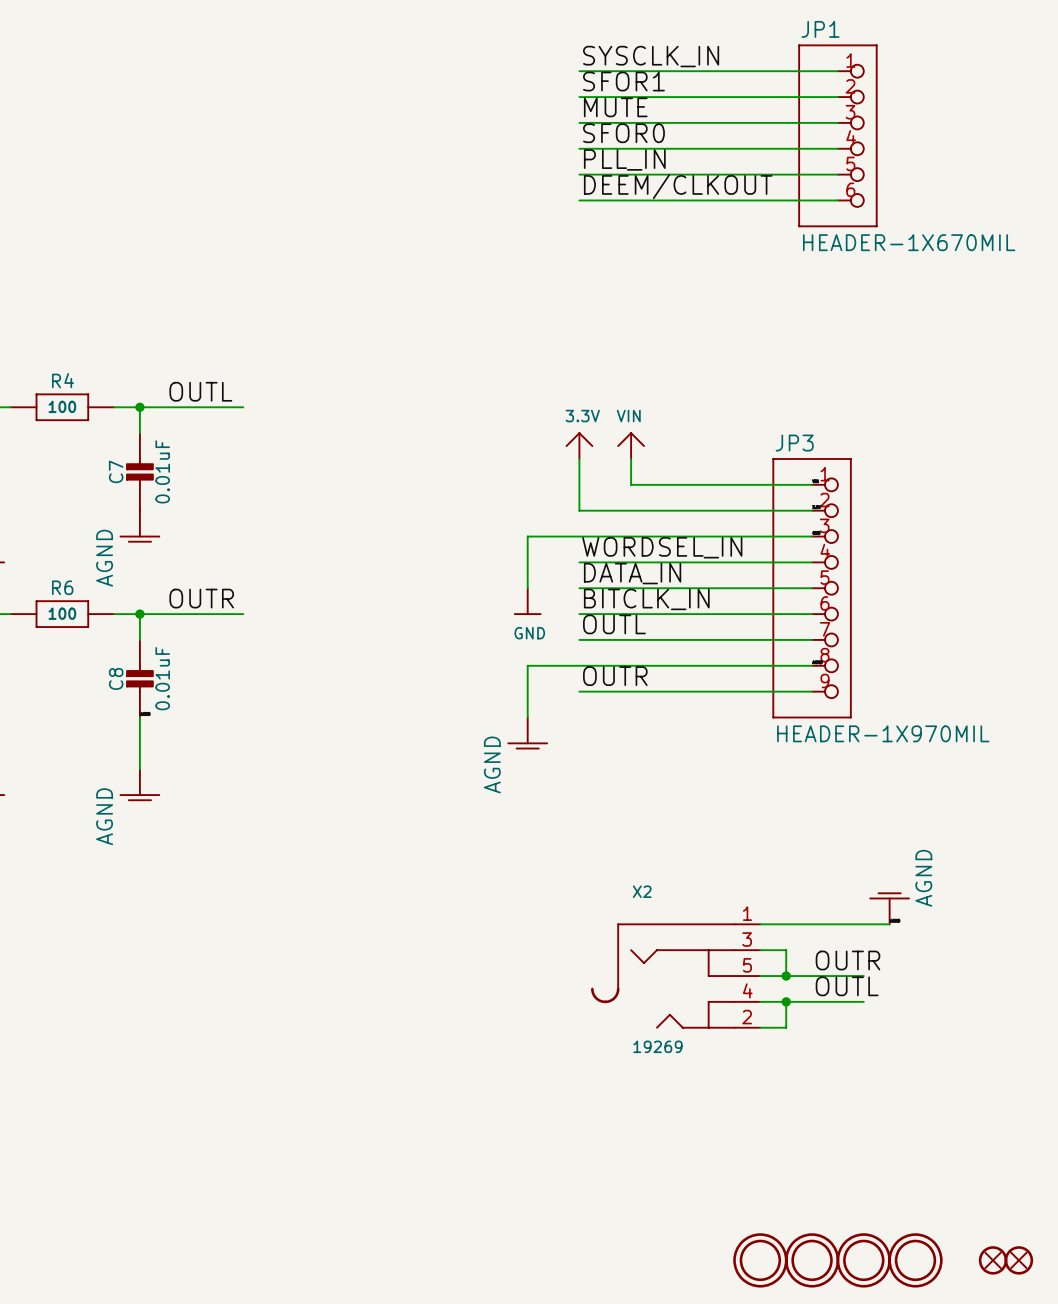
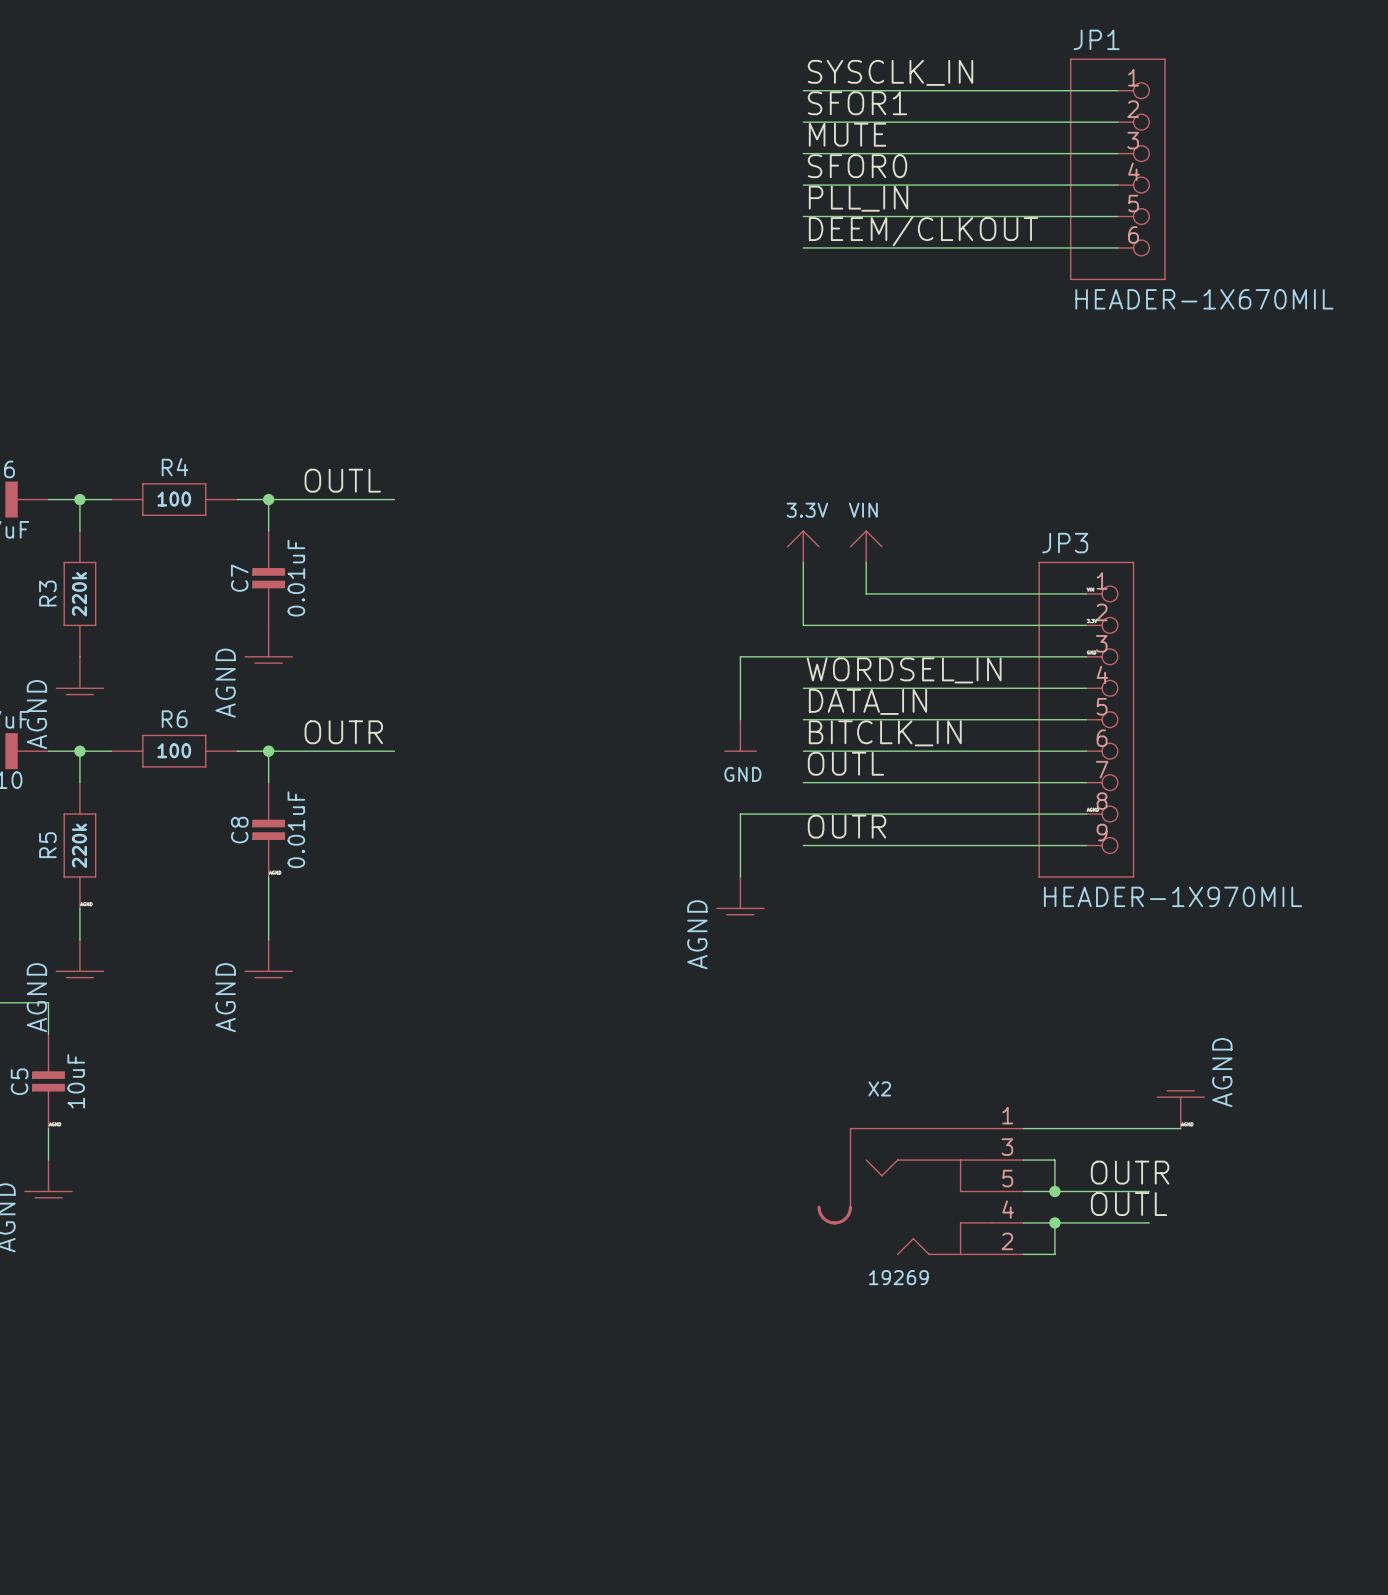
part: (760, 1260) -> none
part: (812, 1260) -> none
part: (863, 1260) -> none
part: (915, 1260) -> none
part: (993, 1260) -> none
part: (1018, 1260) -> none

